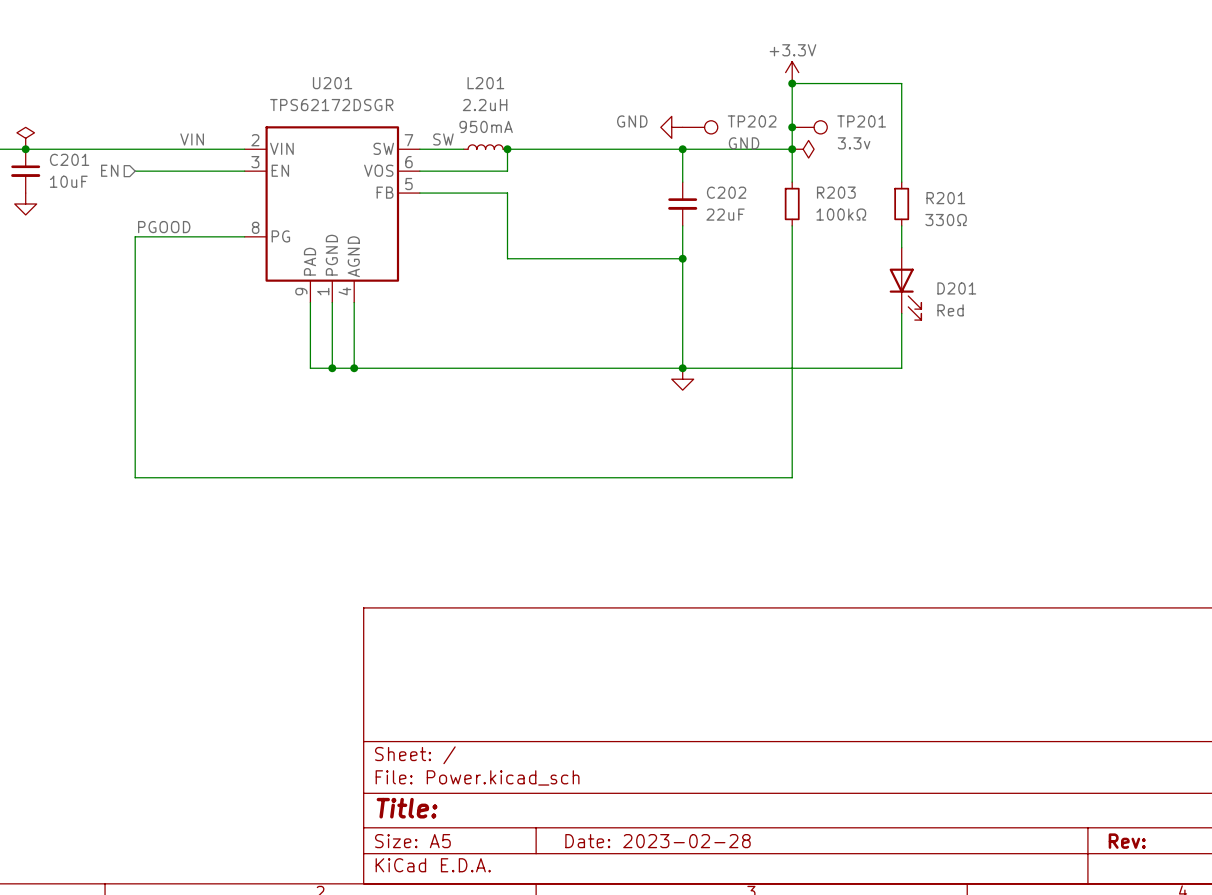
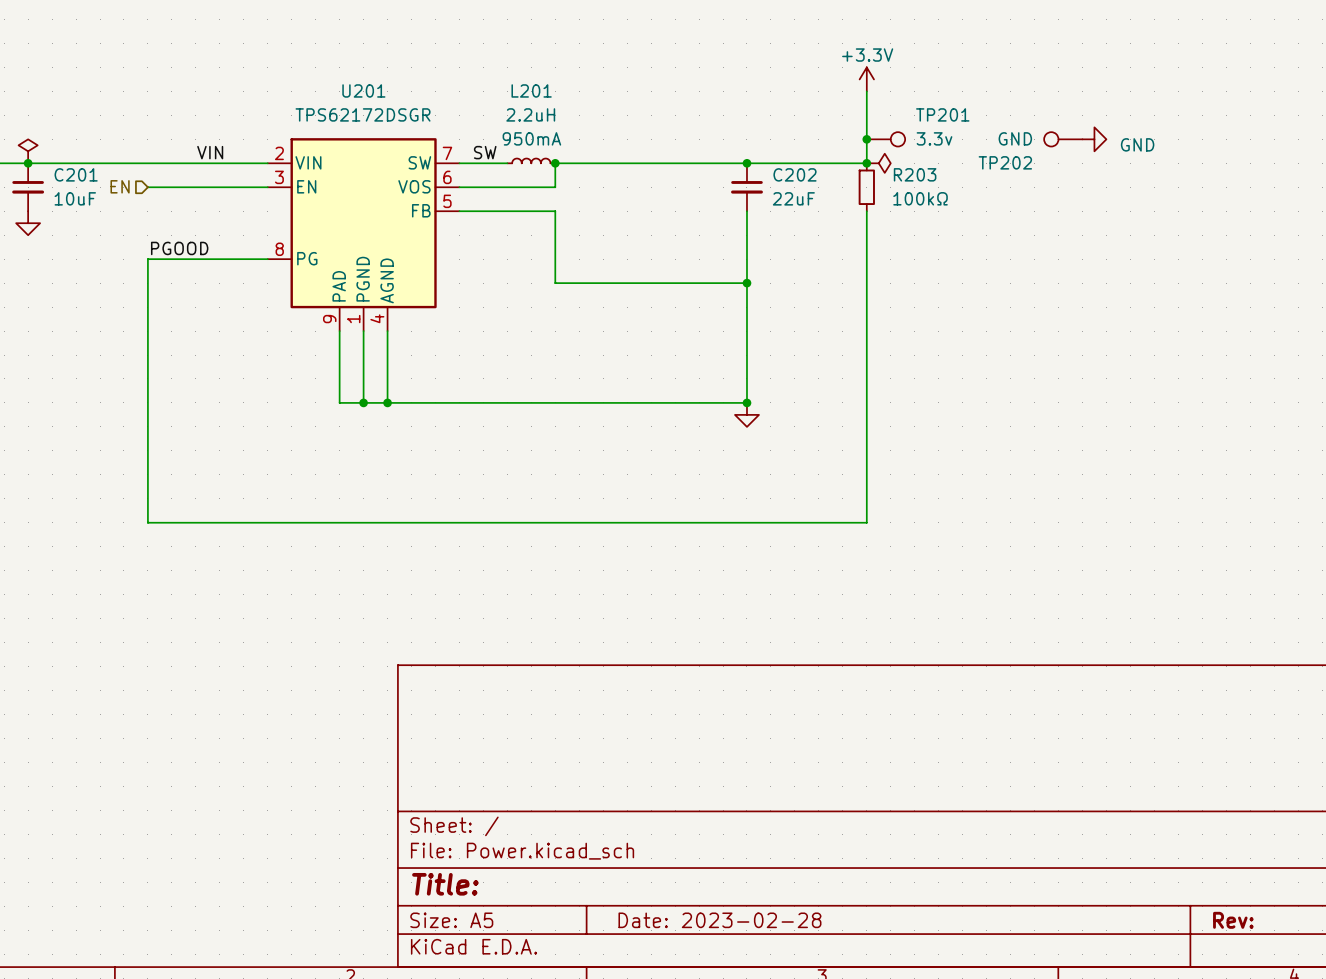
wire: (792, 83) (901, 83) (901, 182) -> none
junction: (792, 83) -> none
TP201 name position: TP201 (861, 121) -> TP201 (942, 114)
power symbol: GND (671, 127) -> none
TP202 position: (700, 127) -> (1063, 139)
TP202 rotation: 0° (711, 127) -> 180° (1051, 139)
power symbol: none -> GND (1094, 139)
TP201 value position: 3.3v (854, 143) -> 3.3v (934, 138)
wire: (792, 149) (792, 182) -> (866, 211) (866, 247)
C202 position: (682, 204) -> (746, 187)
R203 position: (792, 204) -> (866, 187)
R201: (901, 204) -> none
wire: (901, 225) (901, 247) -> none
D201: (905, 283) -> none
wire: (901, 313) (901, 368) (682, 368) -> none

